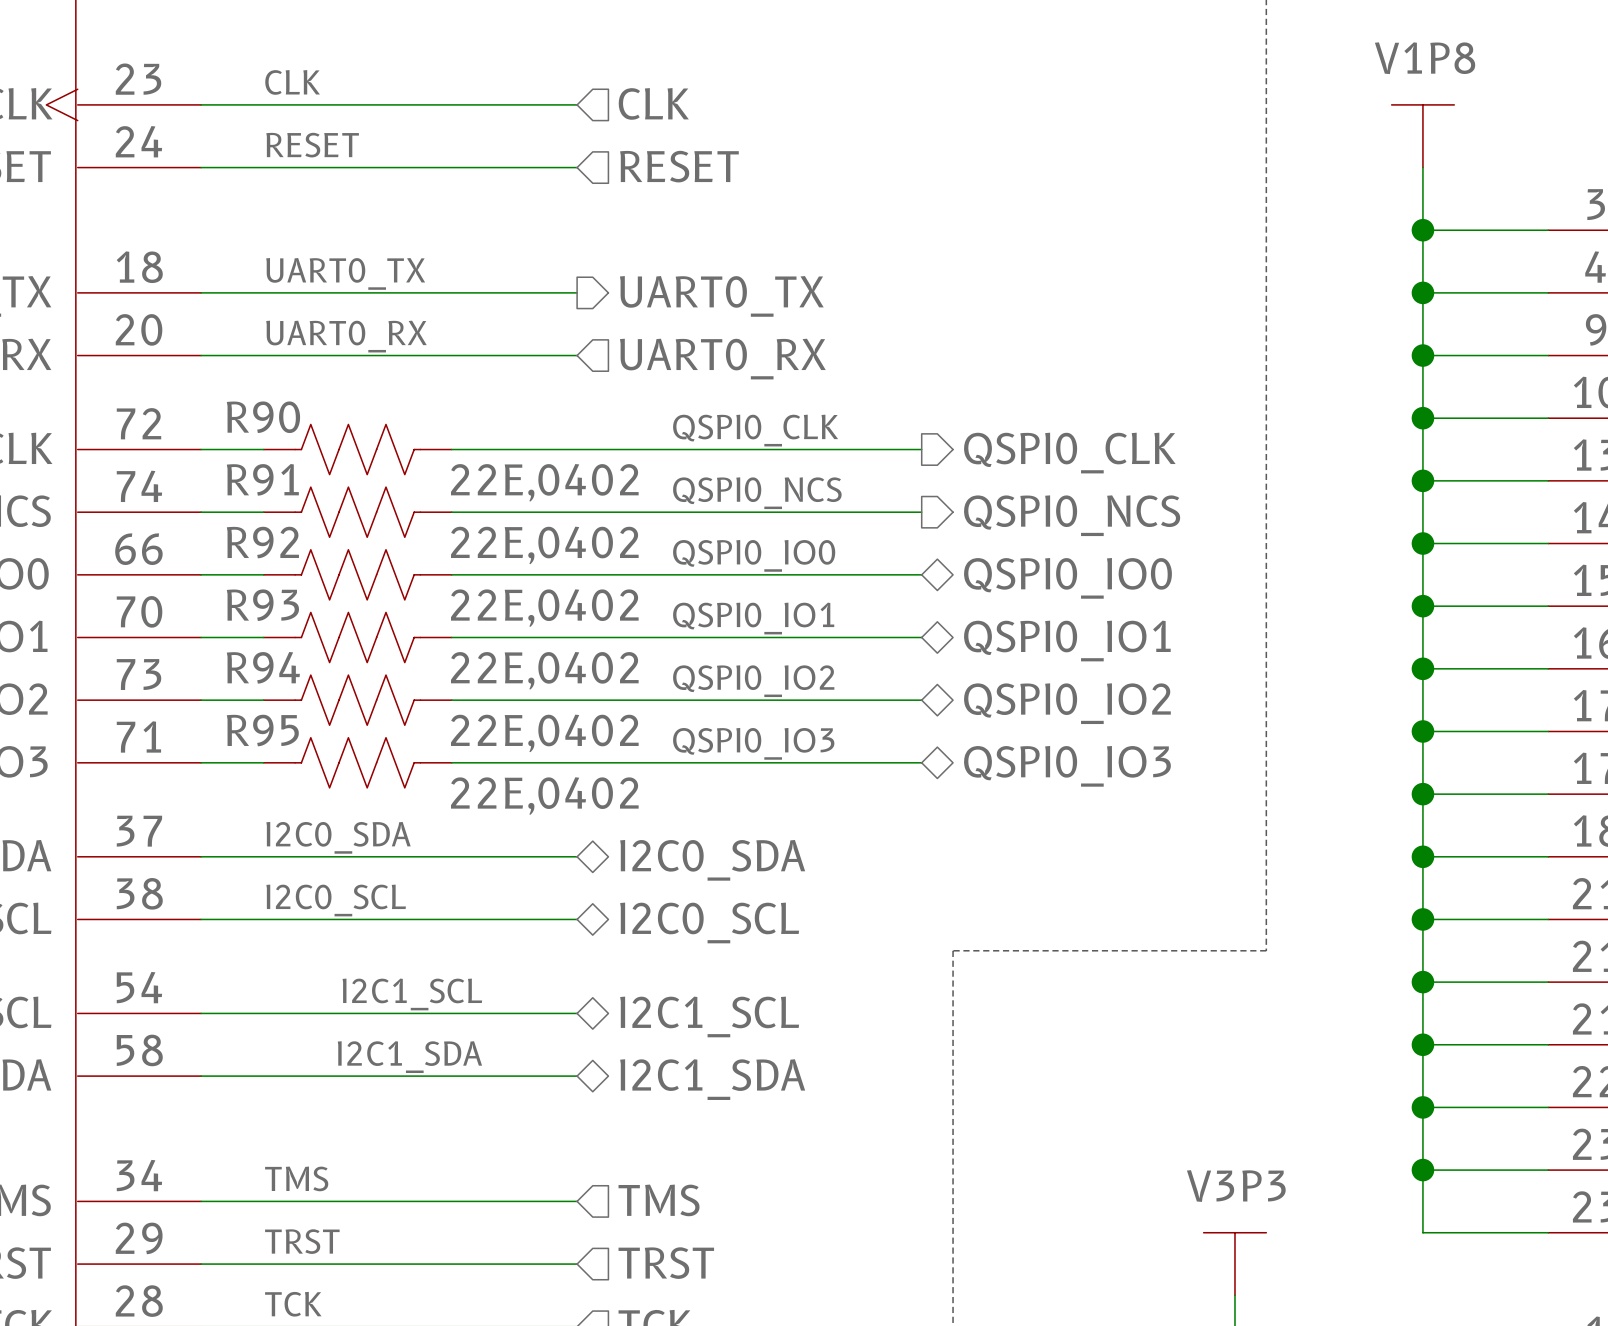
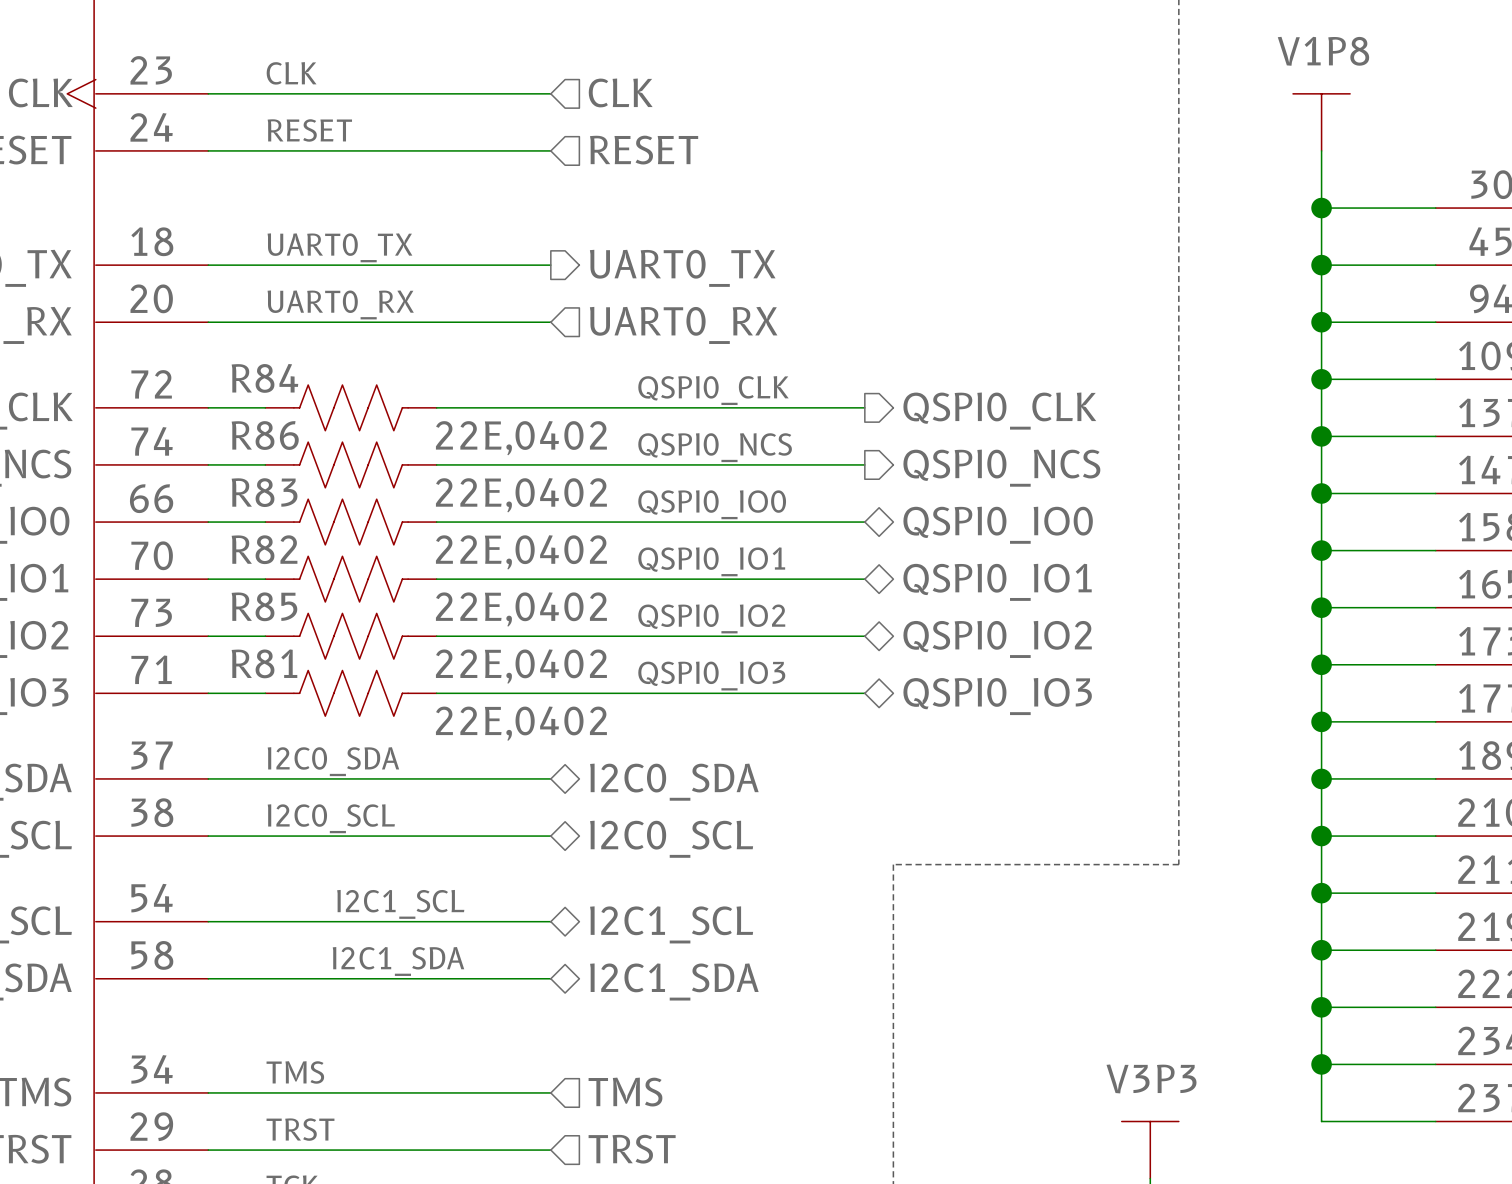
R90 name: R90 (263, 417) -> R84 (264, 378)
R91 name: R91 (262, 479) -> R86 (265, 435)
R92 name: R92 (262, 542) -> R83 (264, 492)
R93 name: R93 (262, 605) -> R82 (264, 549)
R94 name: R94 (263, 667) -> R85 (264, 606)
R95 name: R95 (262, 730) -> R81 (264, 663)

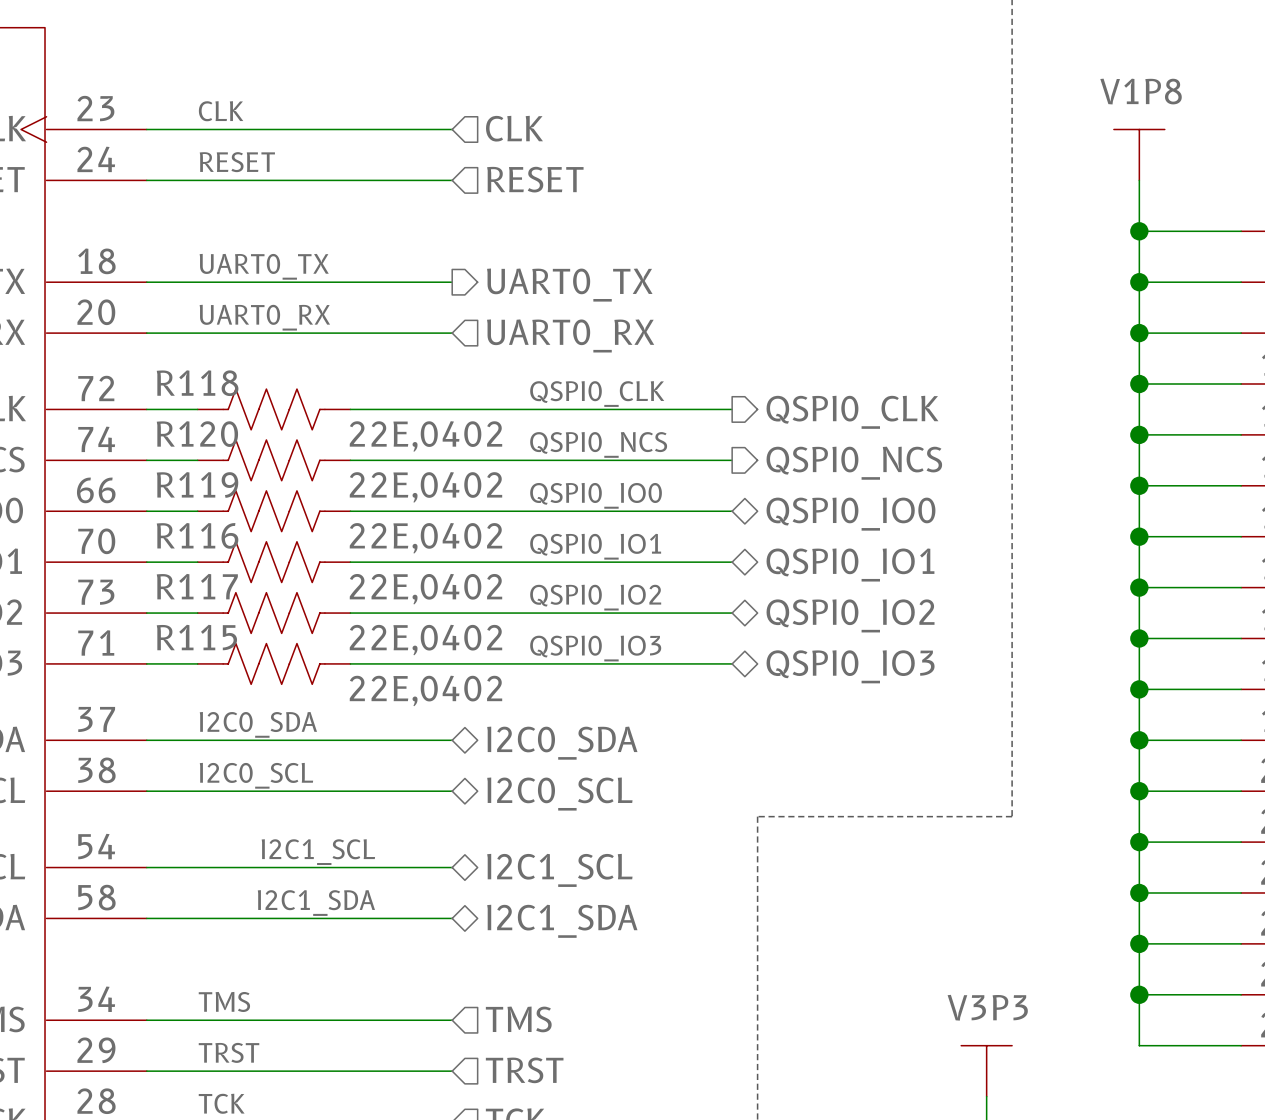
R84 name: R84 (264, 378) -> R118 (197, 383)
R86 name: R86 (265, 435) -> R120 (197, 434)
R83 name: R83 (264, 492) -> R119 (197, 484)
R82 name: R82 (264, 549) -> R116 (197, 535)
R85 name: R85 (264, 606) -> R117 (197, 586)
R81 name: R81 (264, 663) -> R115 (196, 637)

